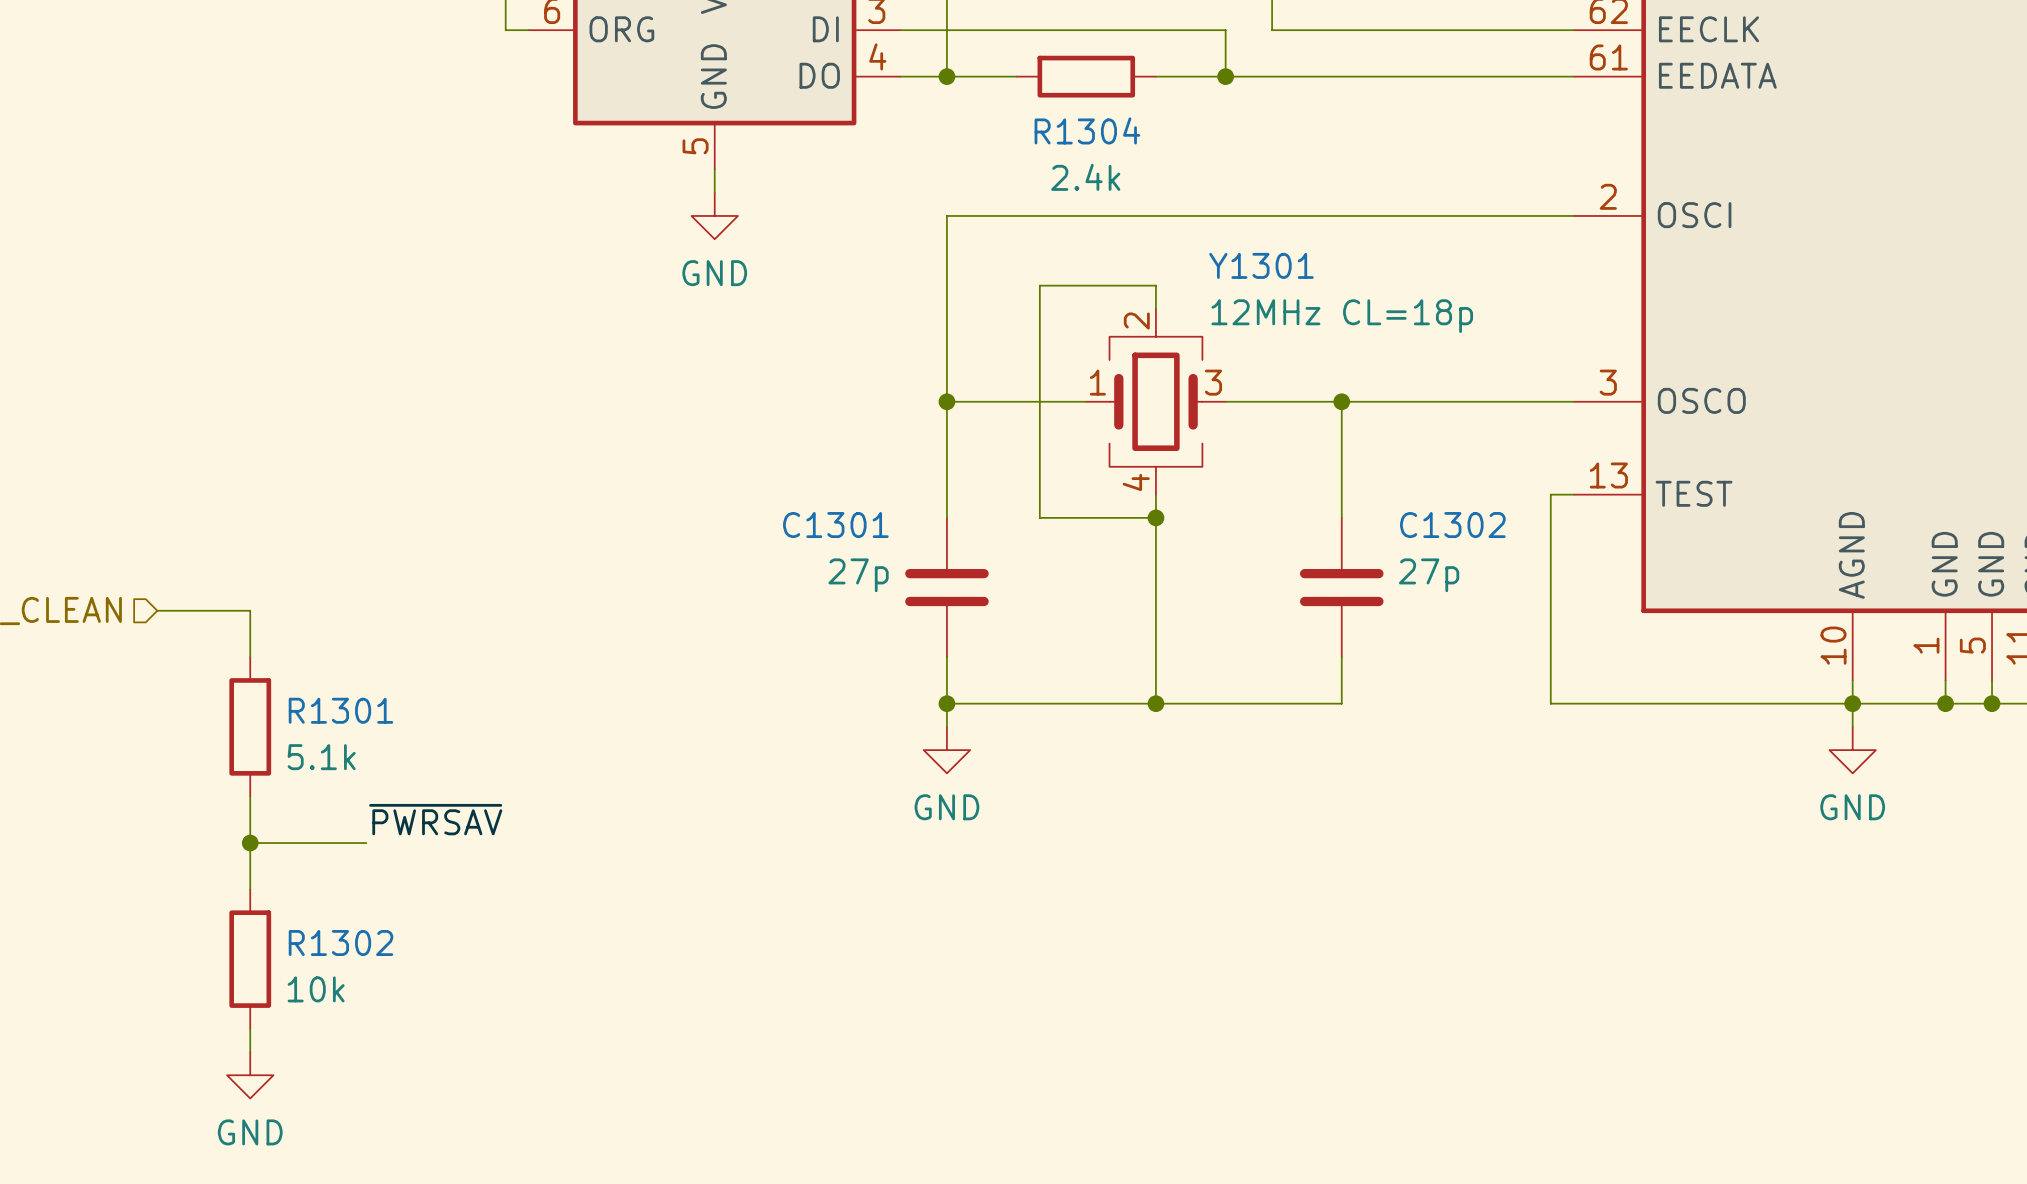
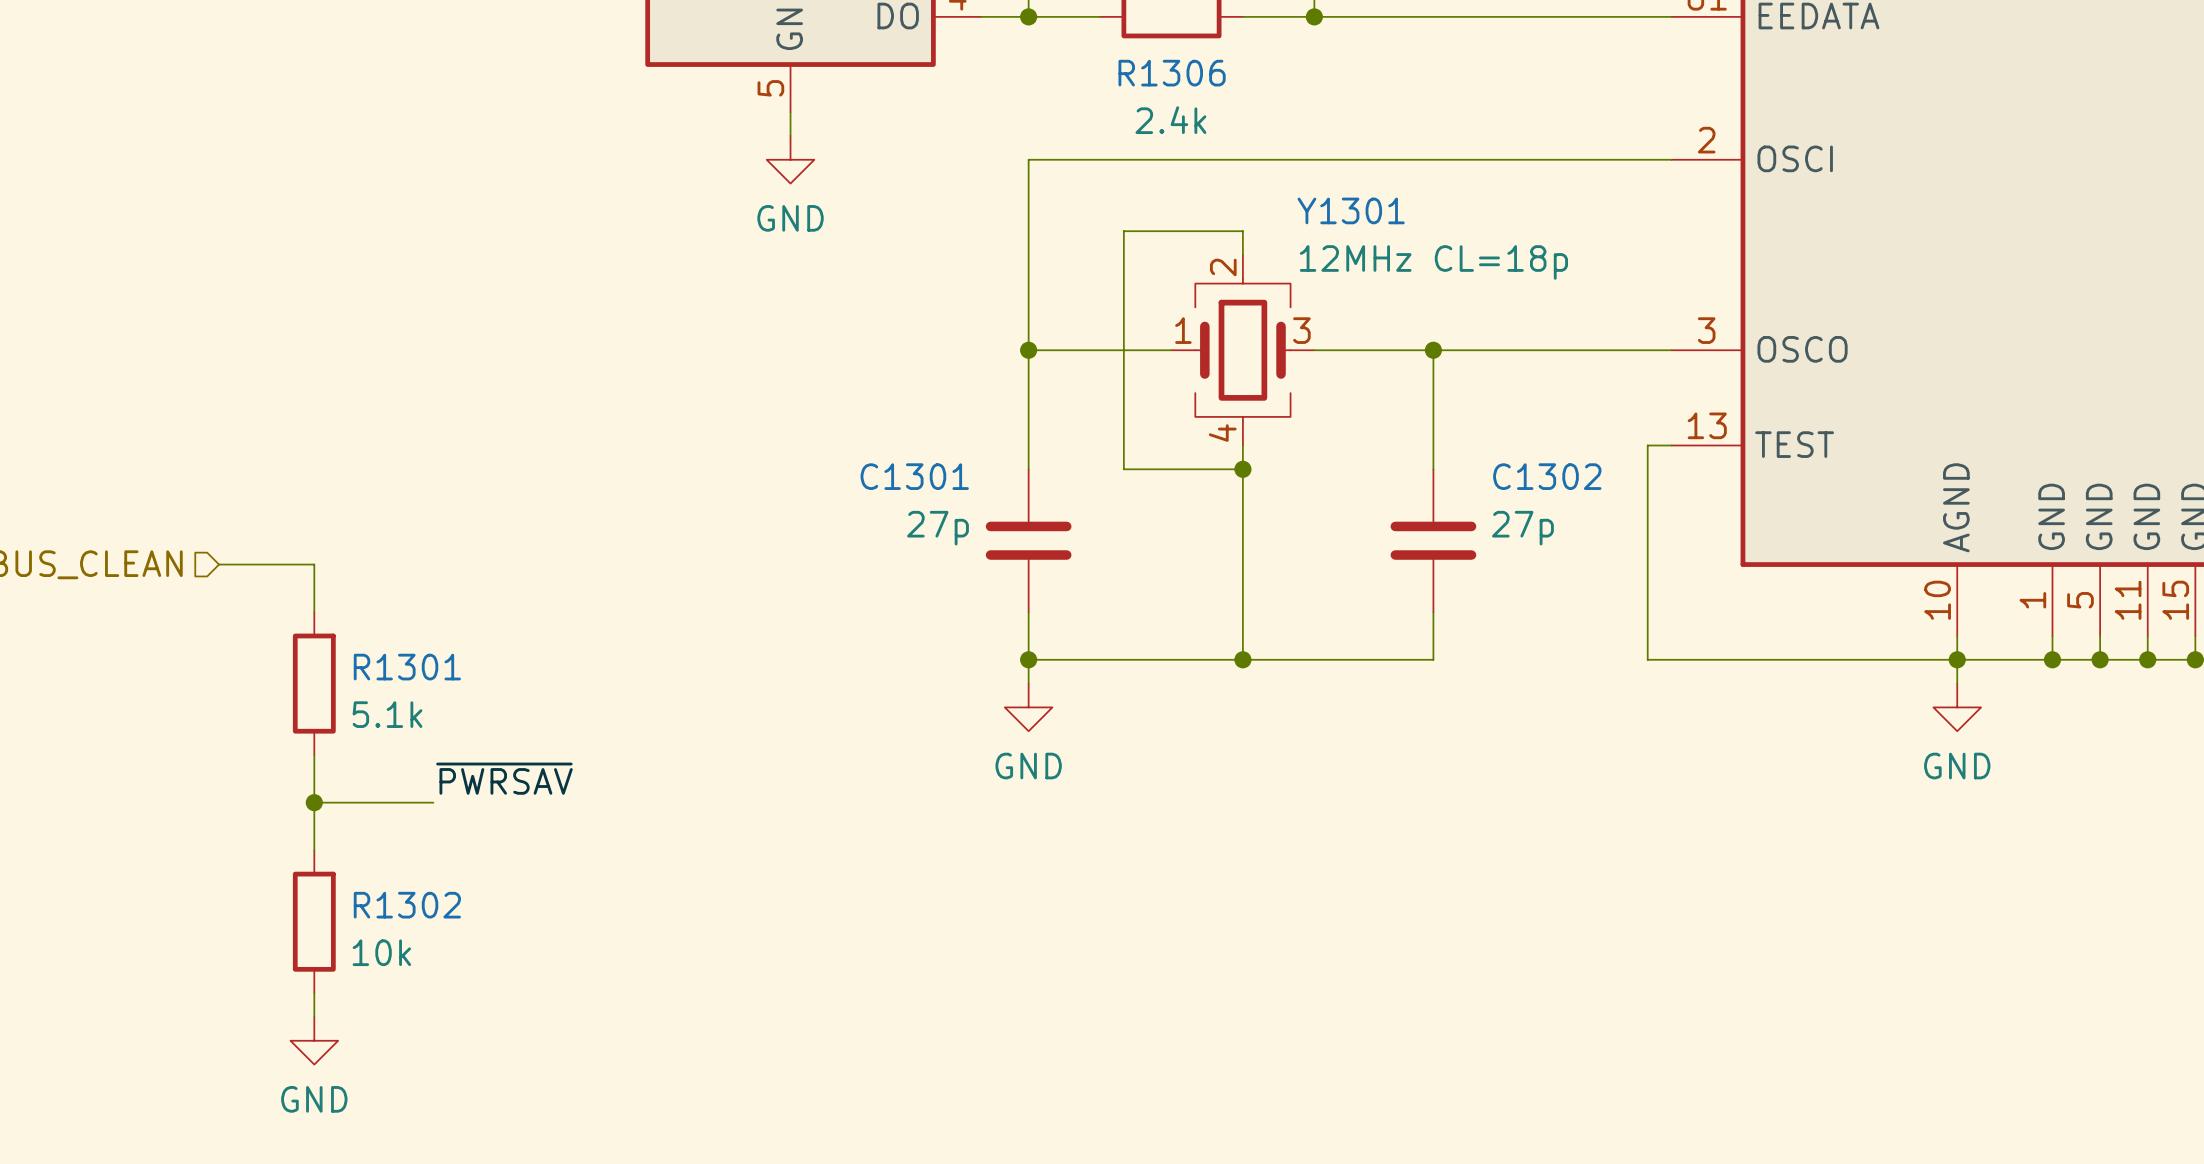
R1304 name: R1304 (1087, 130) -> R1306 (1172, 73)

